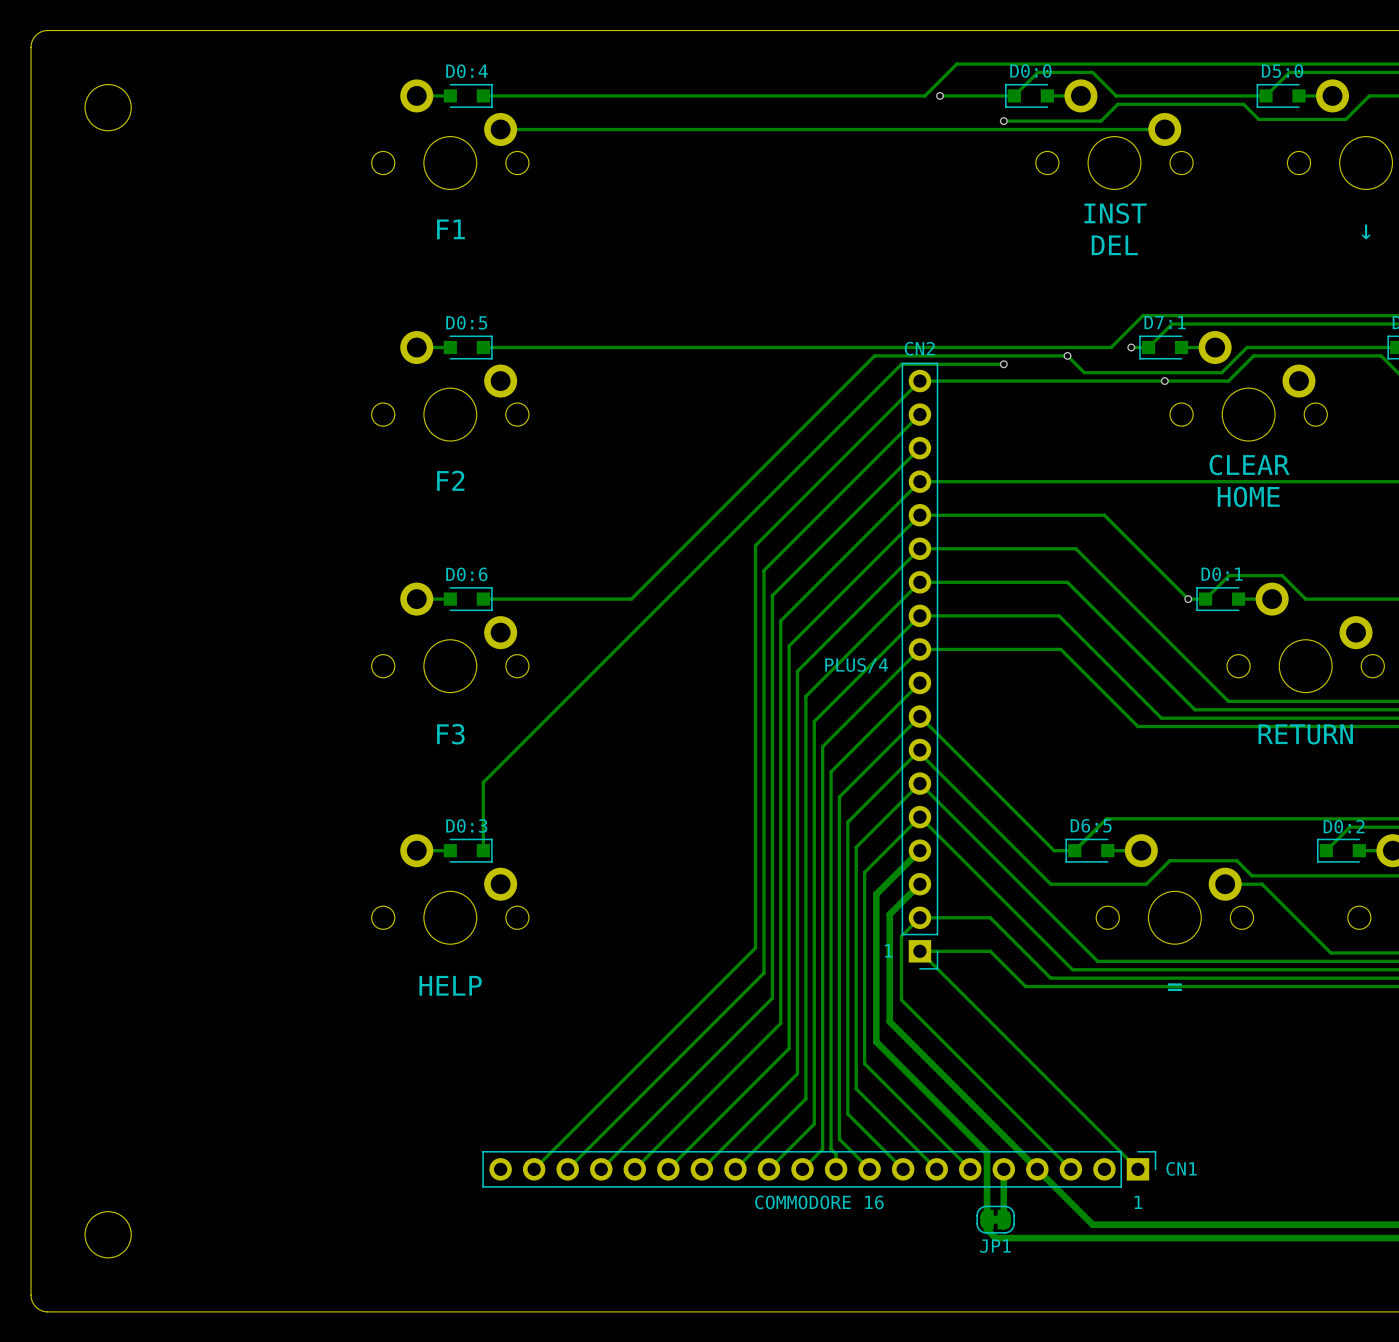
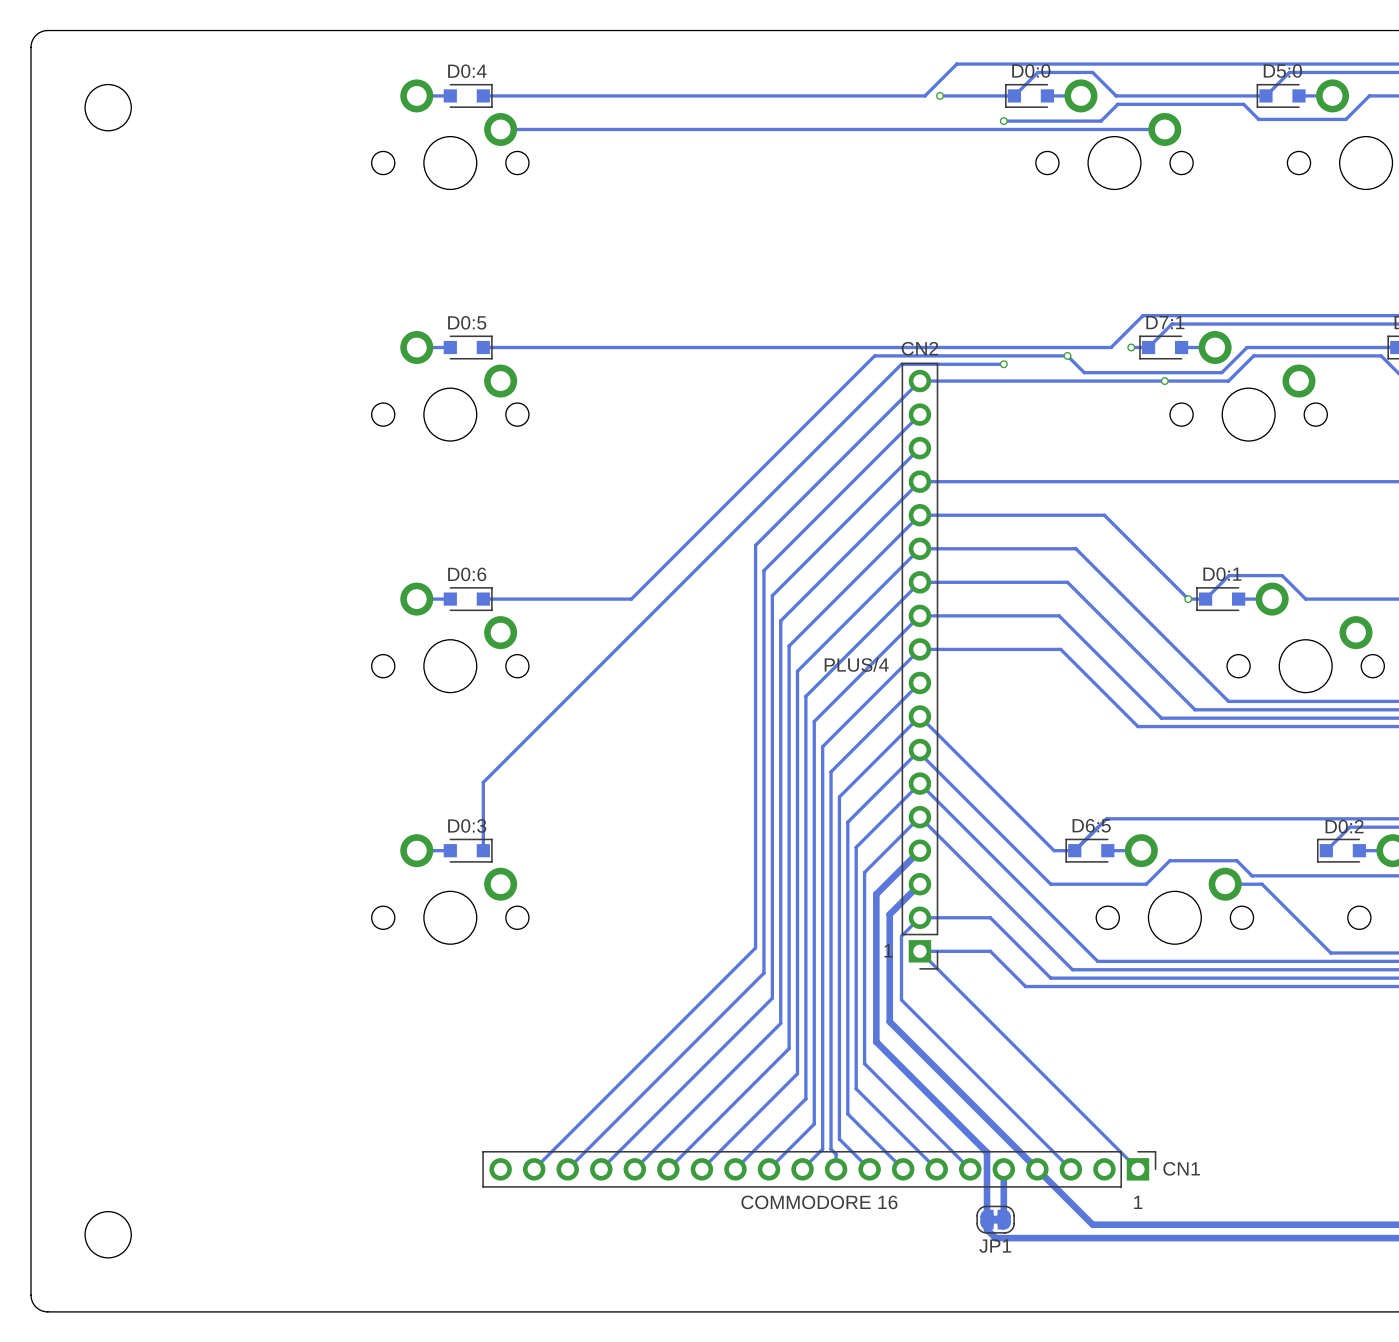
text: INST (1115, 213) -> none
text: F1 (450, 229) -> none
text: ↓ (1366, 231) -> none
text: DEL (1114, 245) -> none
text: CLEAR (1249, 465) -> none
text: F2 (450, 480) -> none
text: HOME (1248, 496) -> none
text: F3 (450, 734) -> none
text: RETURN (1305, 734) -> none
text: HELP (450, 985) -> none
text: = (1174, 987) -> none

